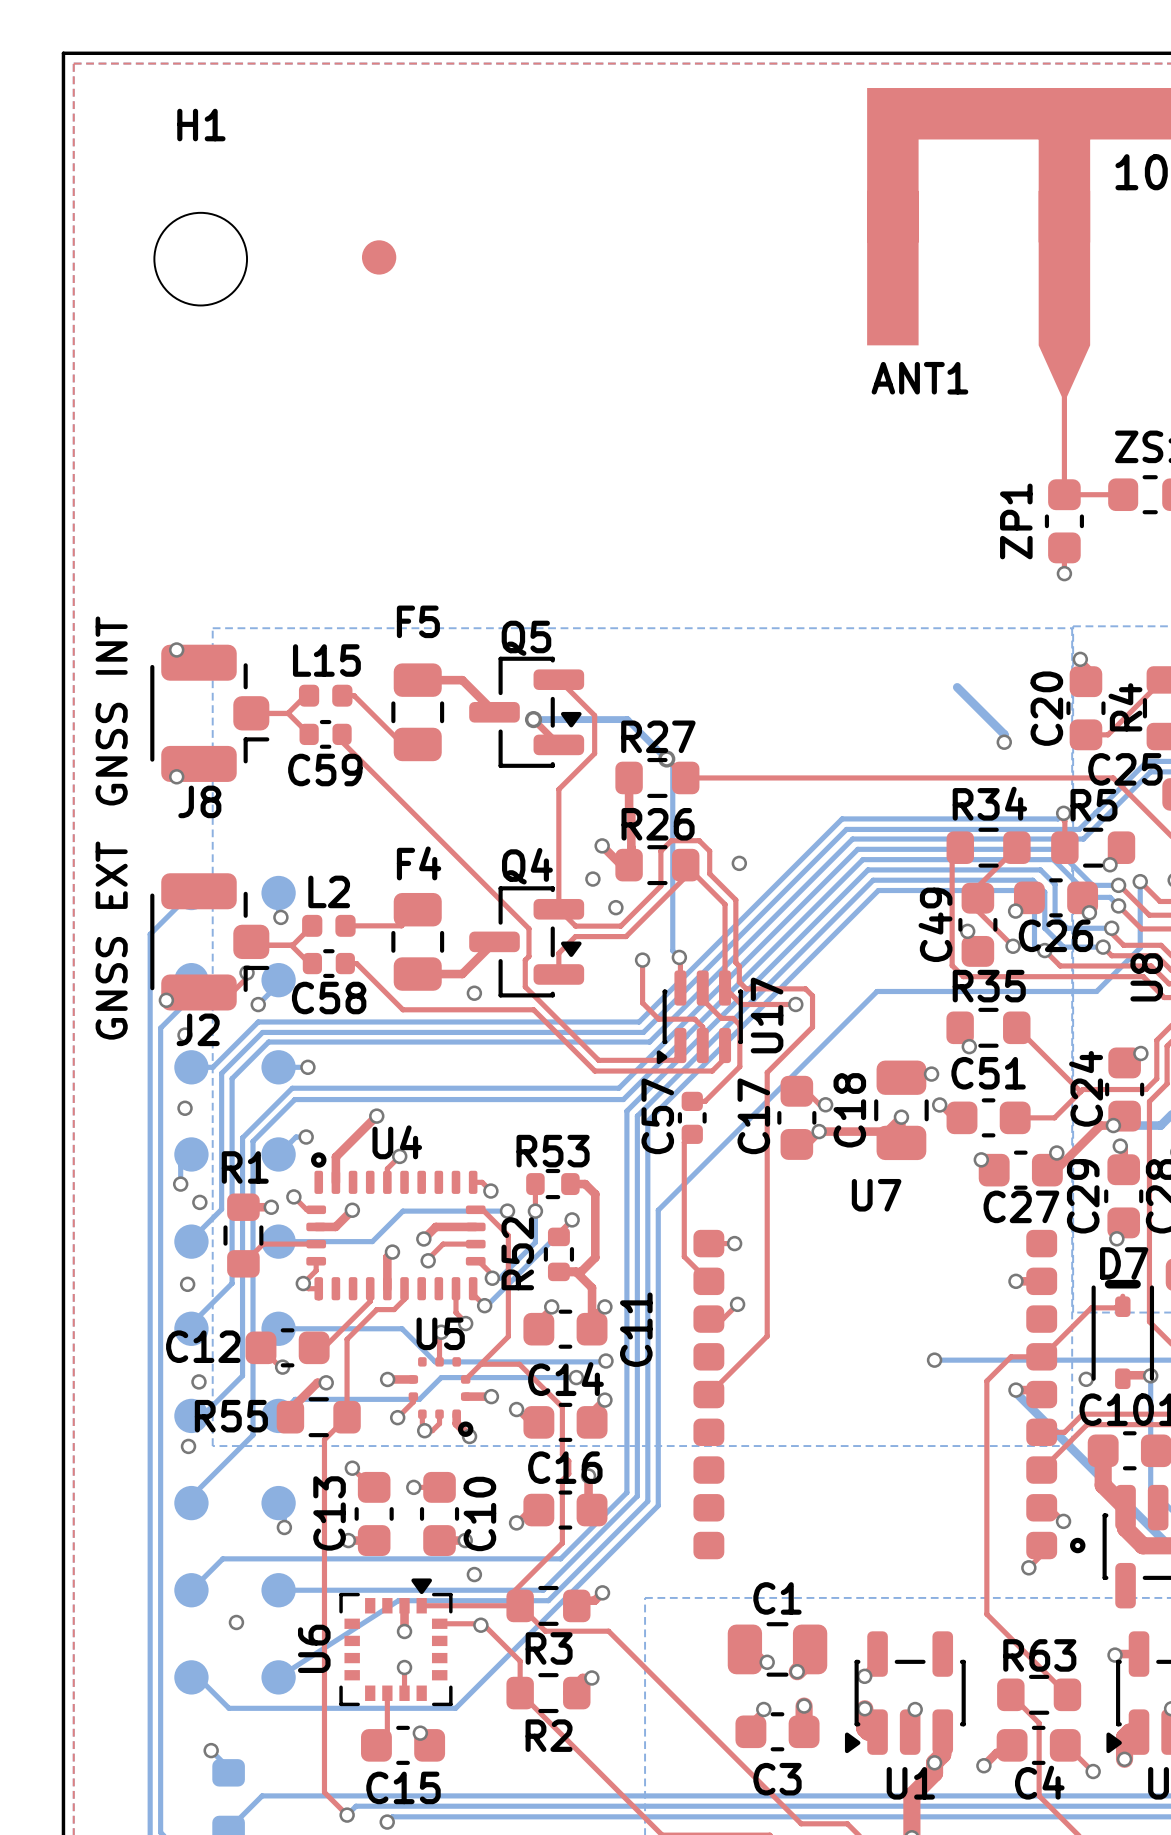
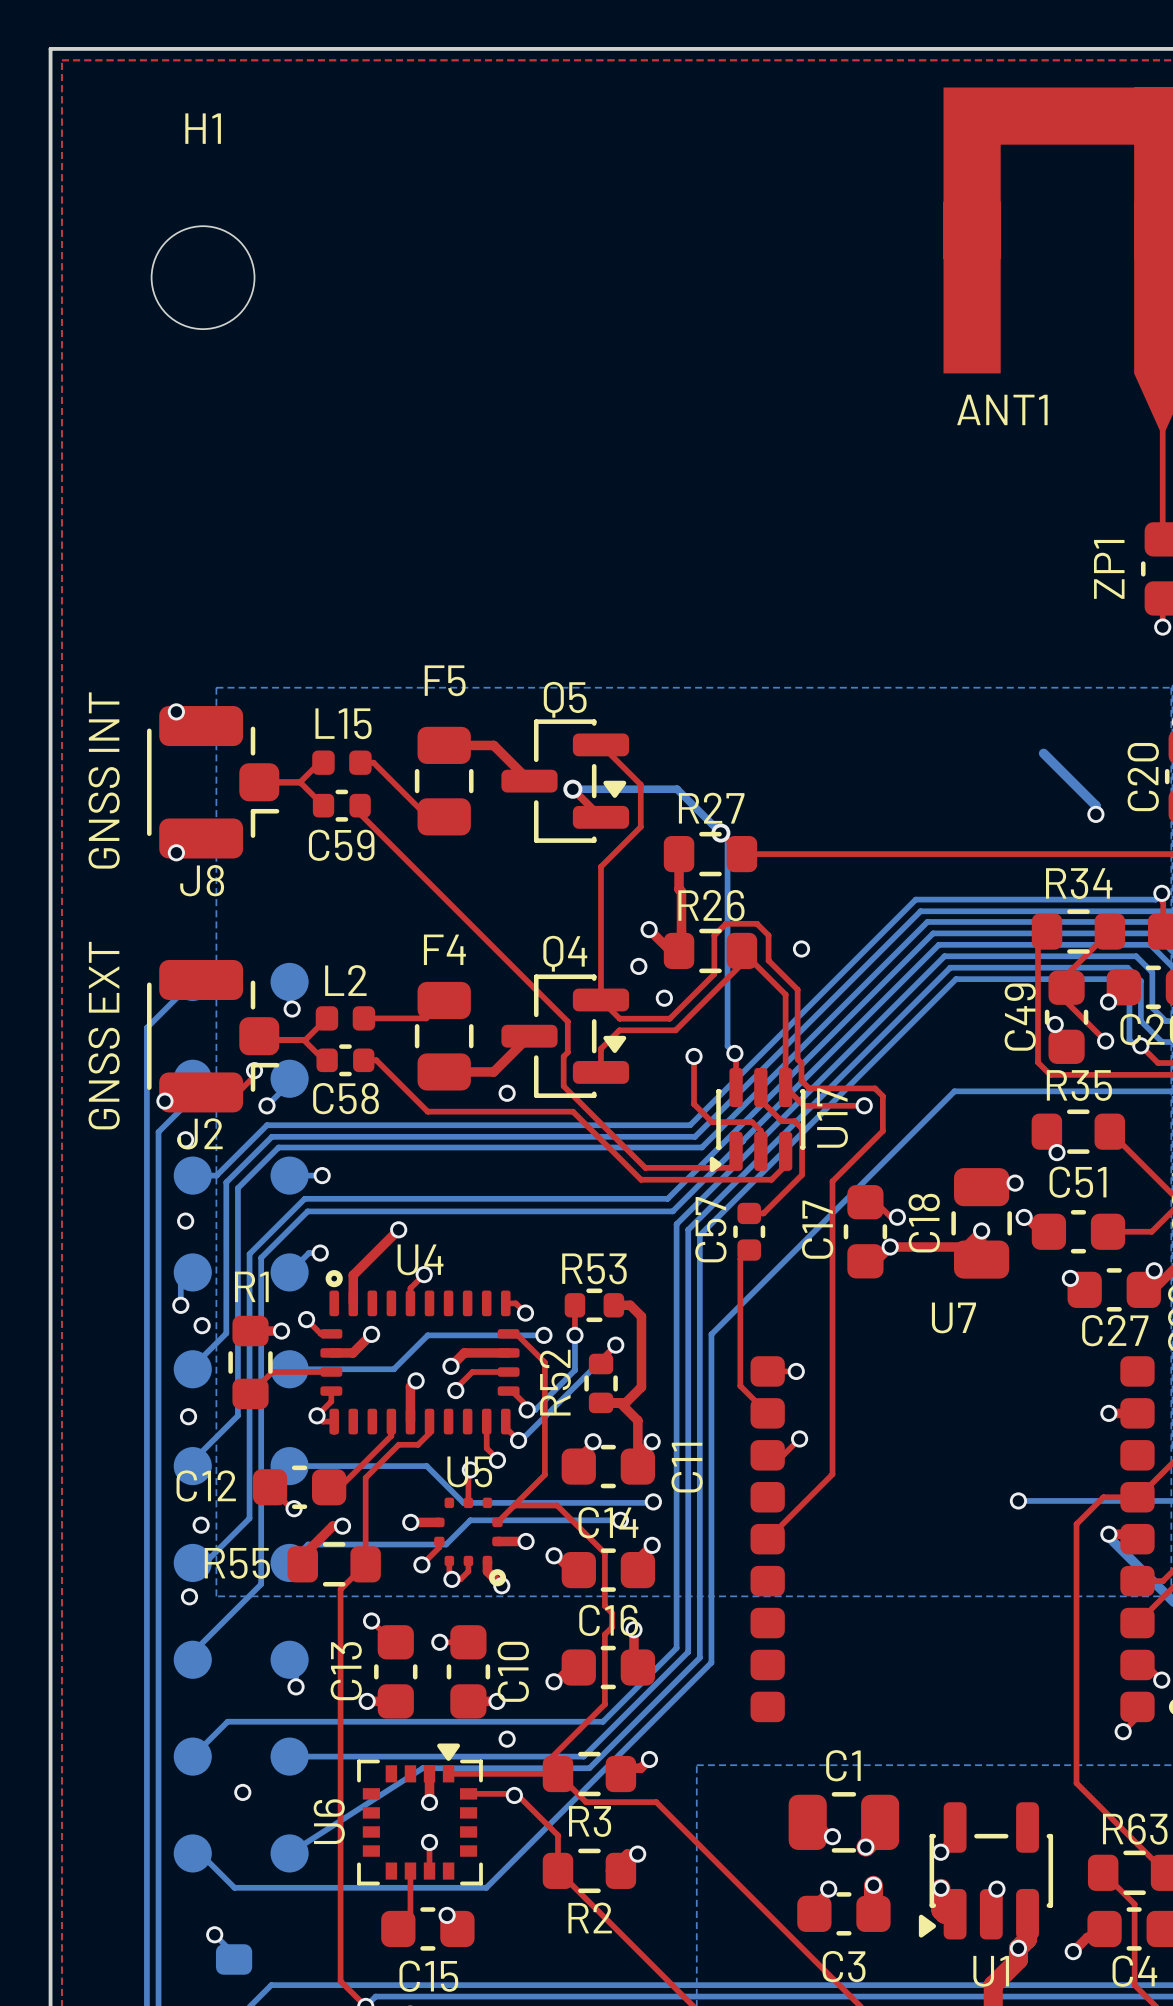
part: (379, 257) -> none

